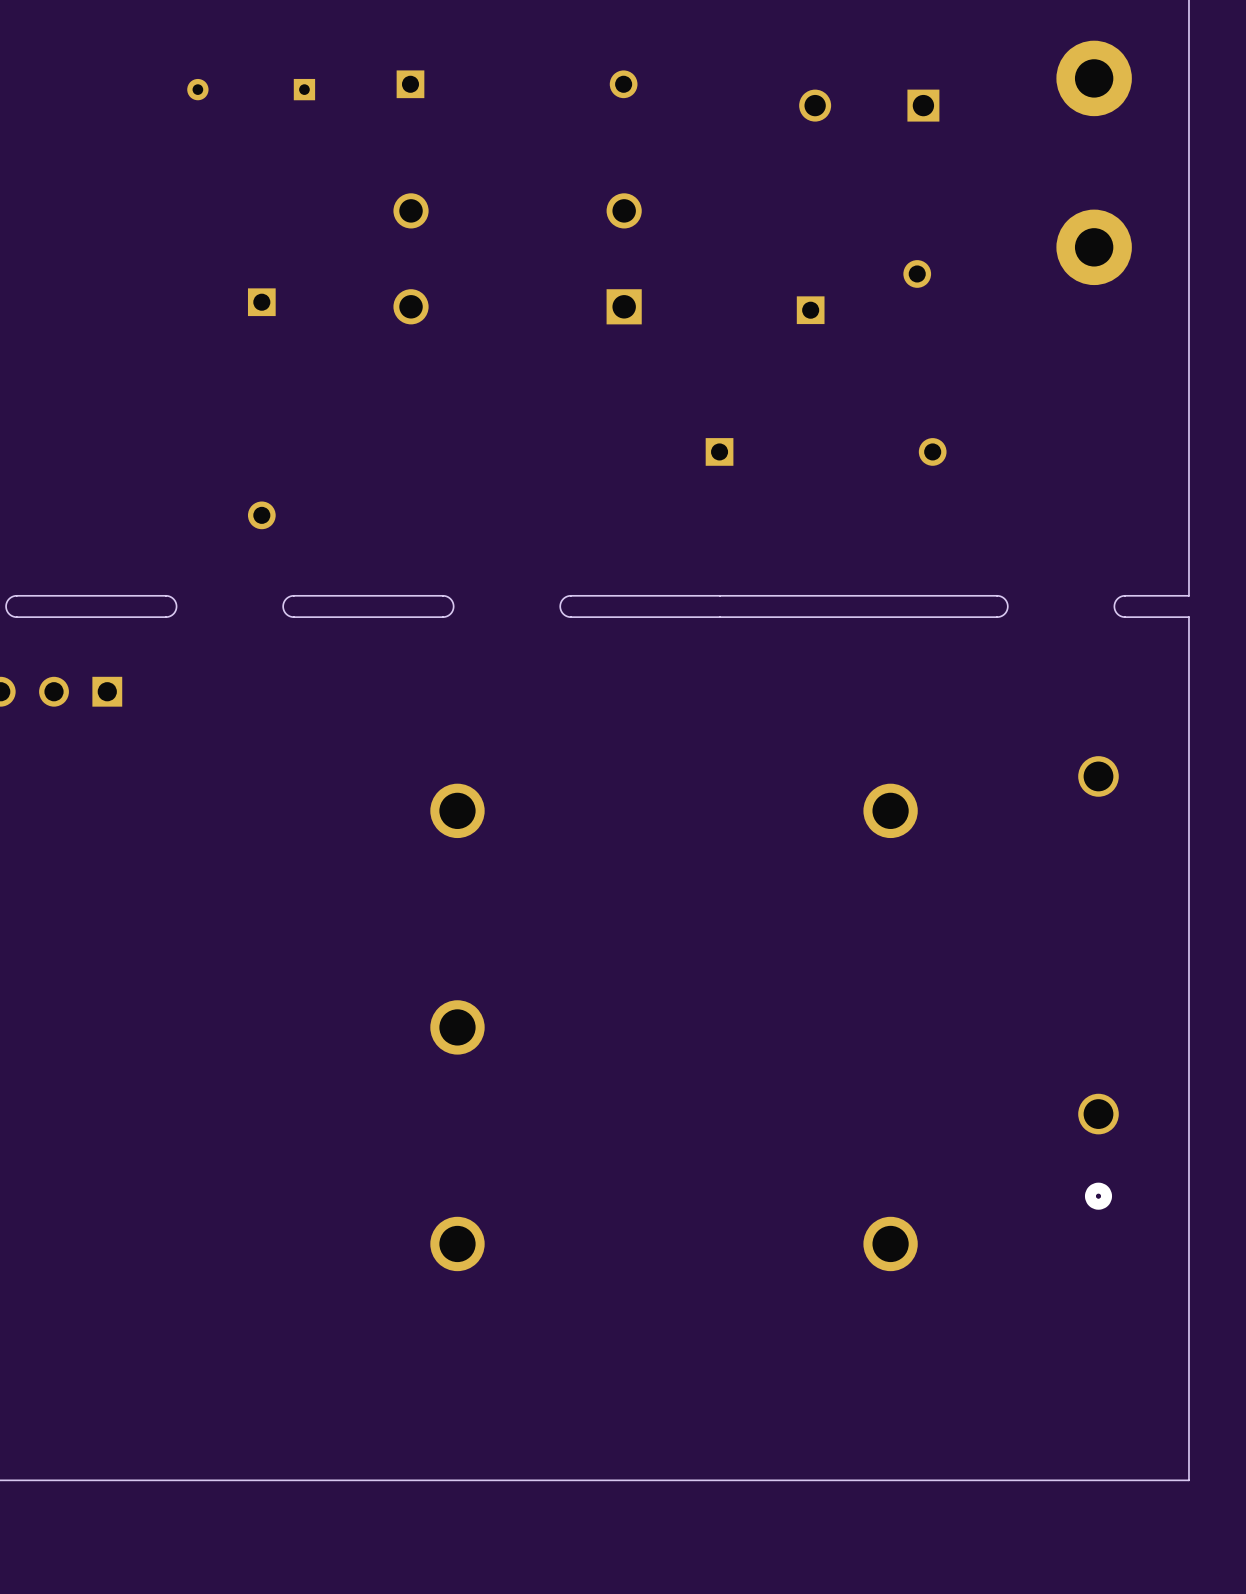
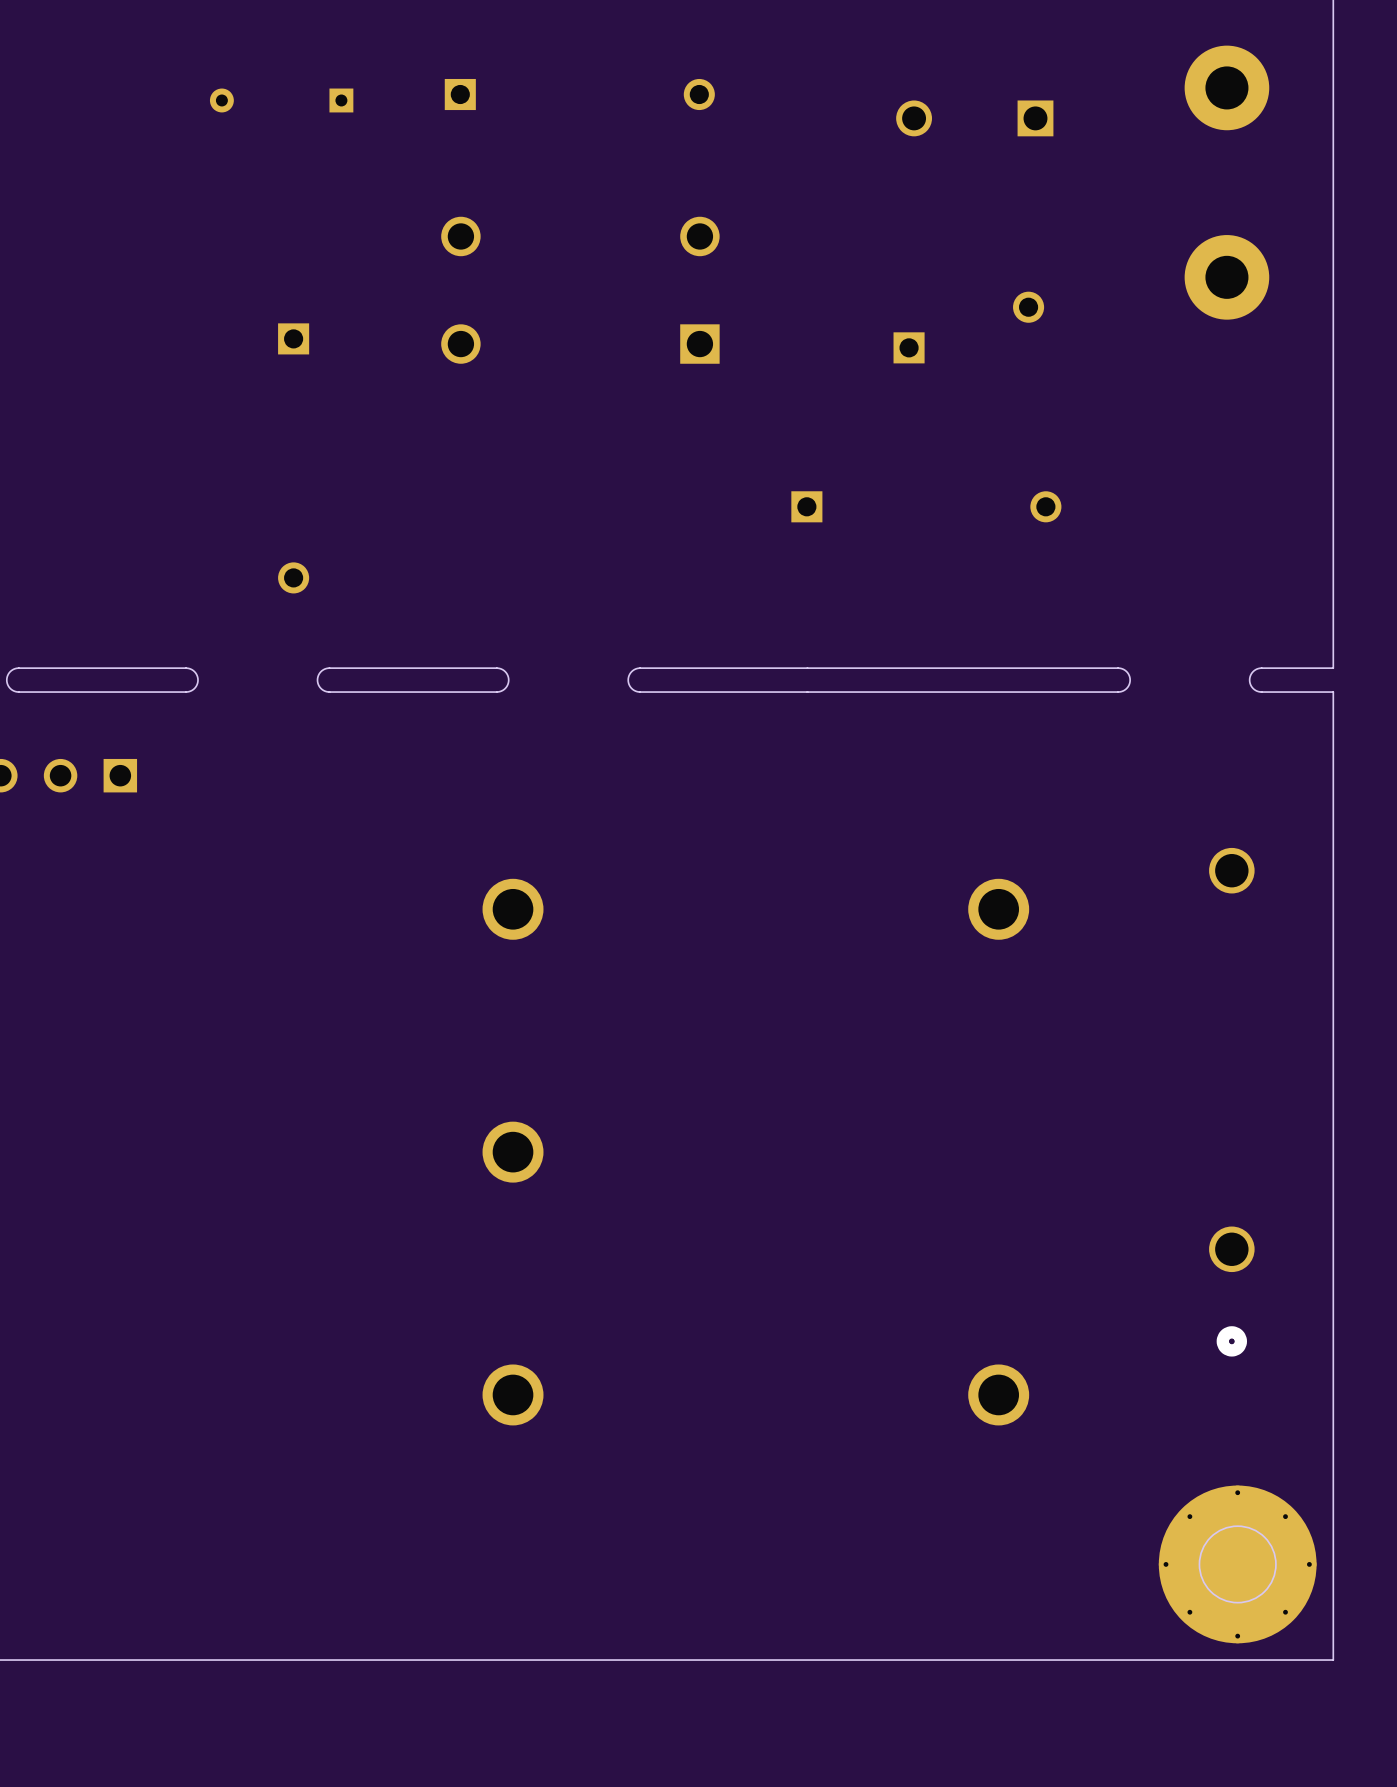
part: none -> (1237, 1564)

